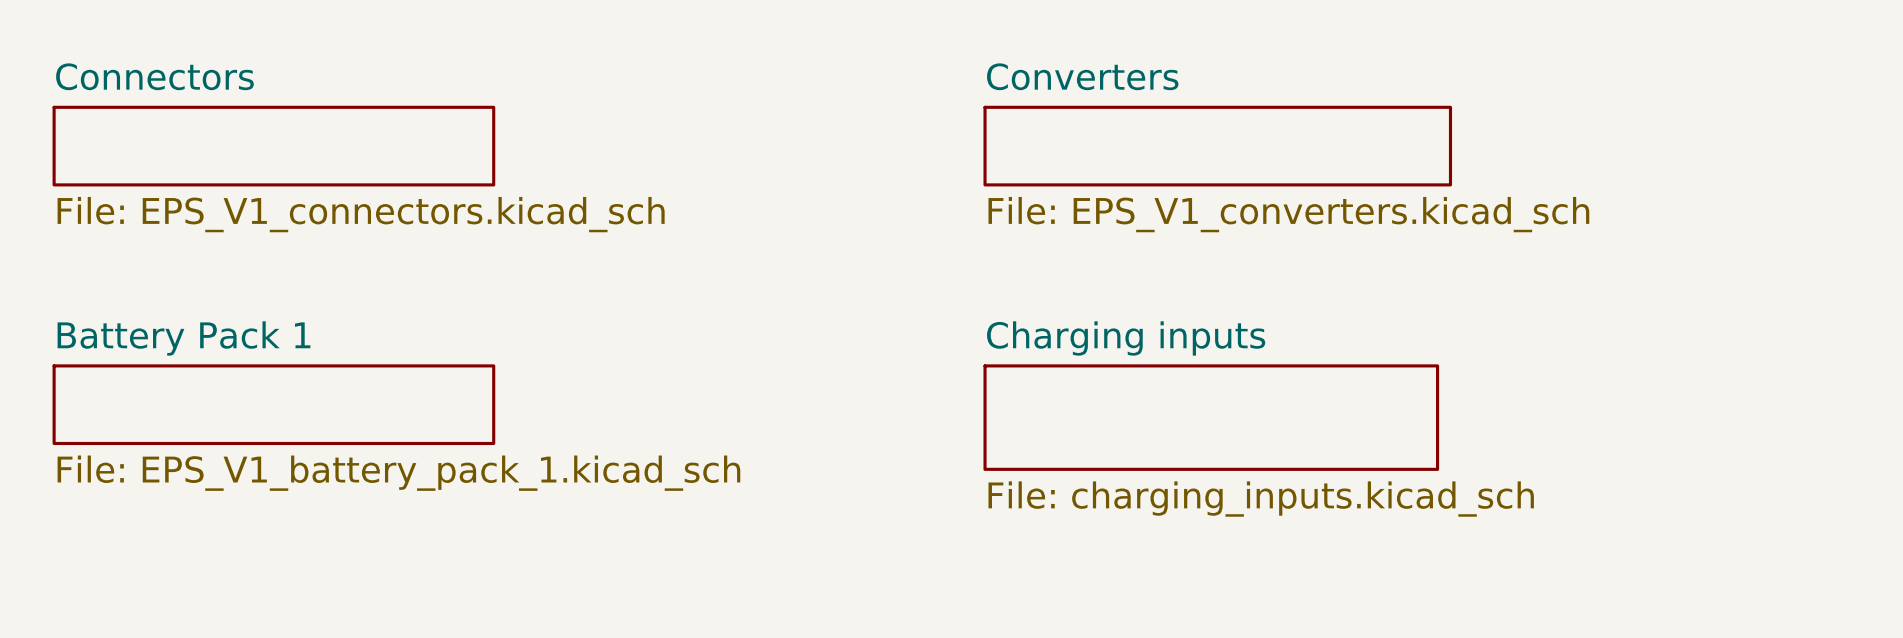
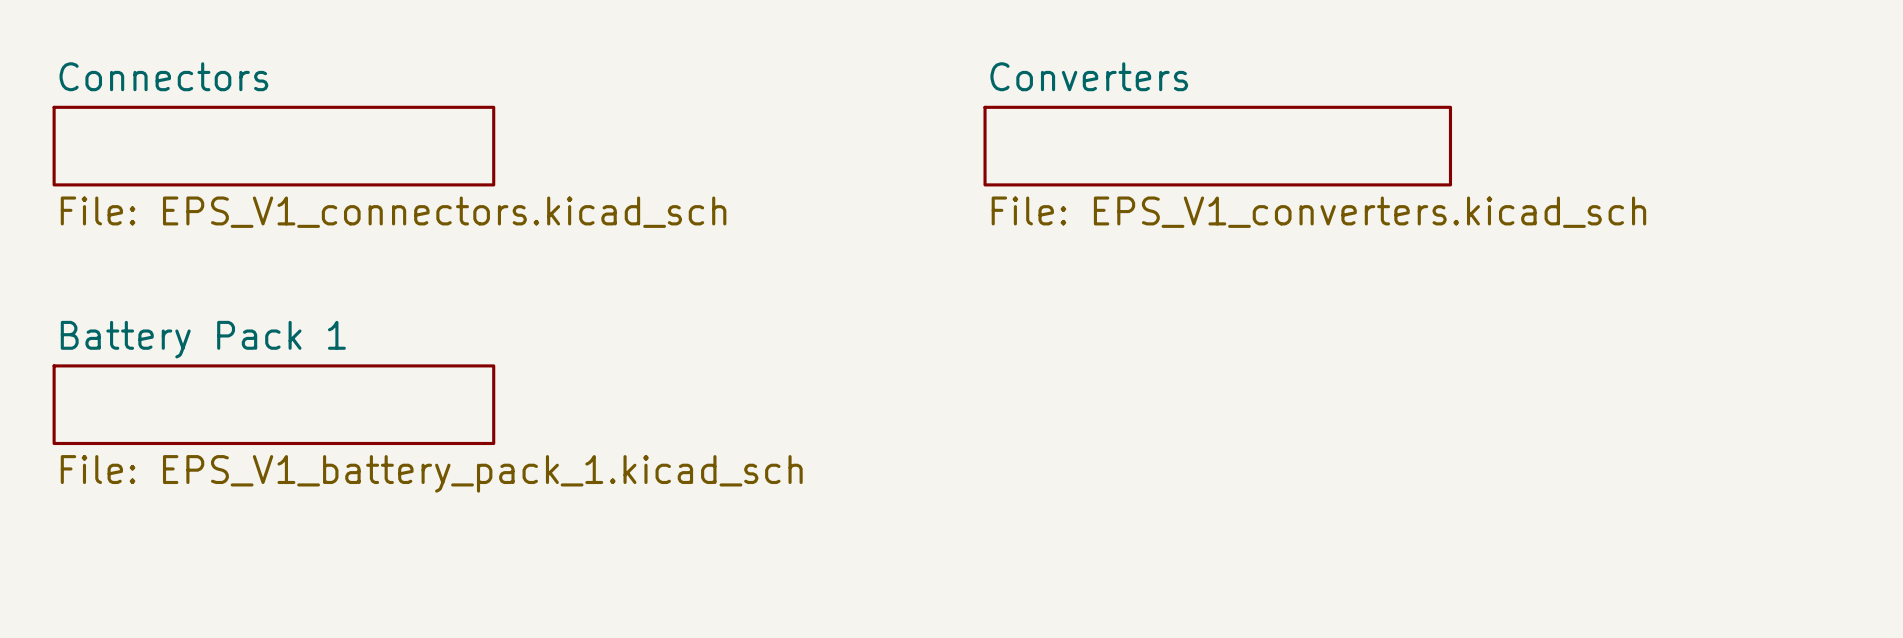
sheet Charging inputs: File: charging_inputs.kicad_sch (1211, 417) -> none

